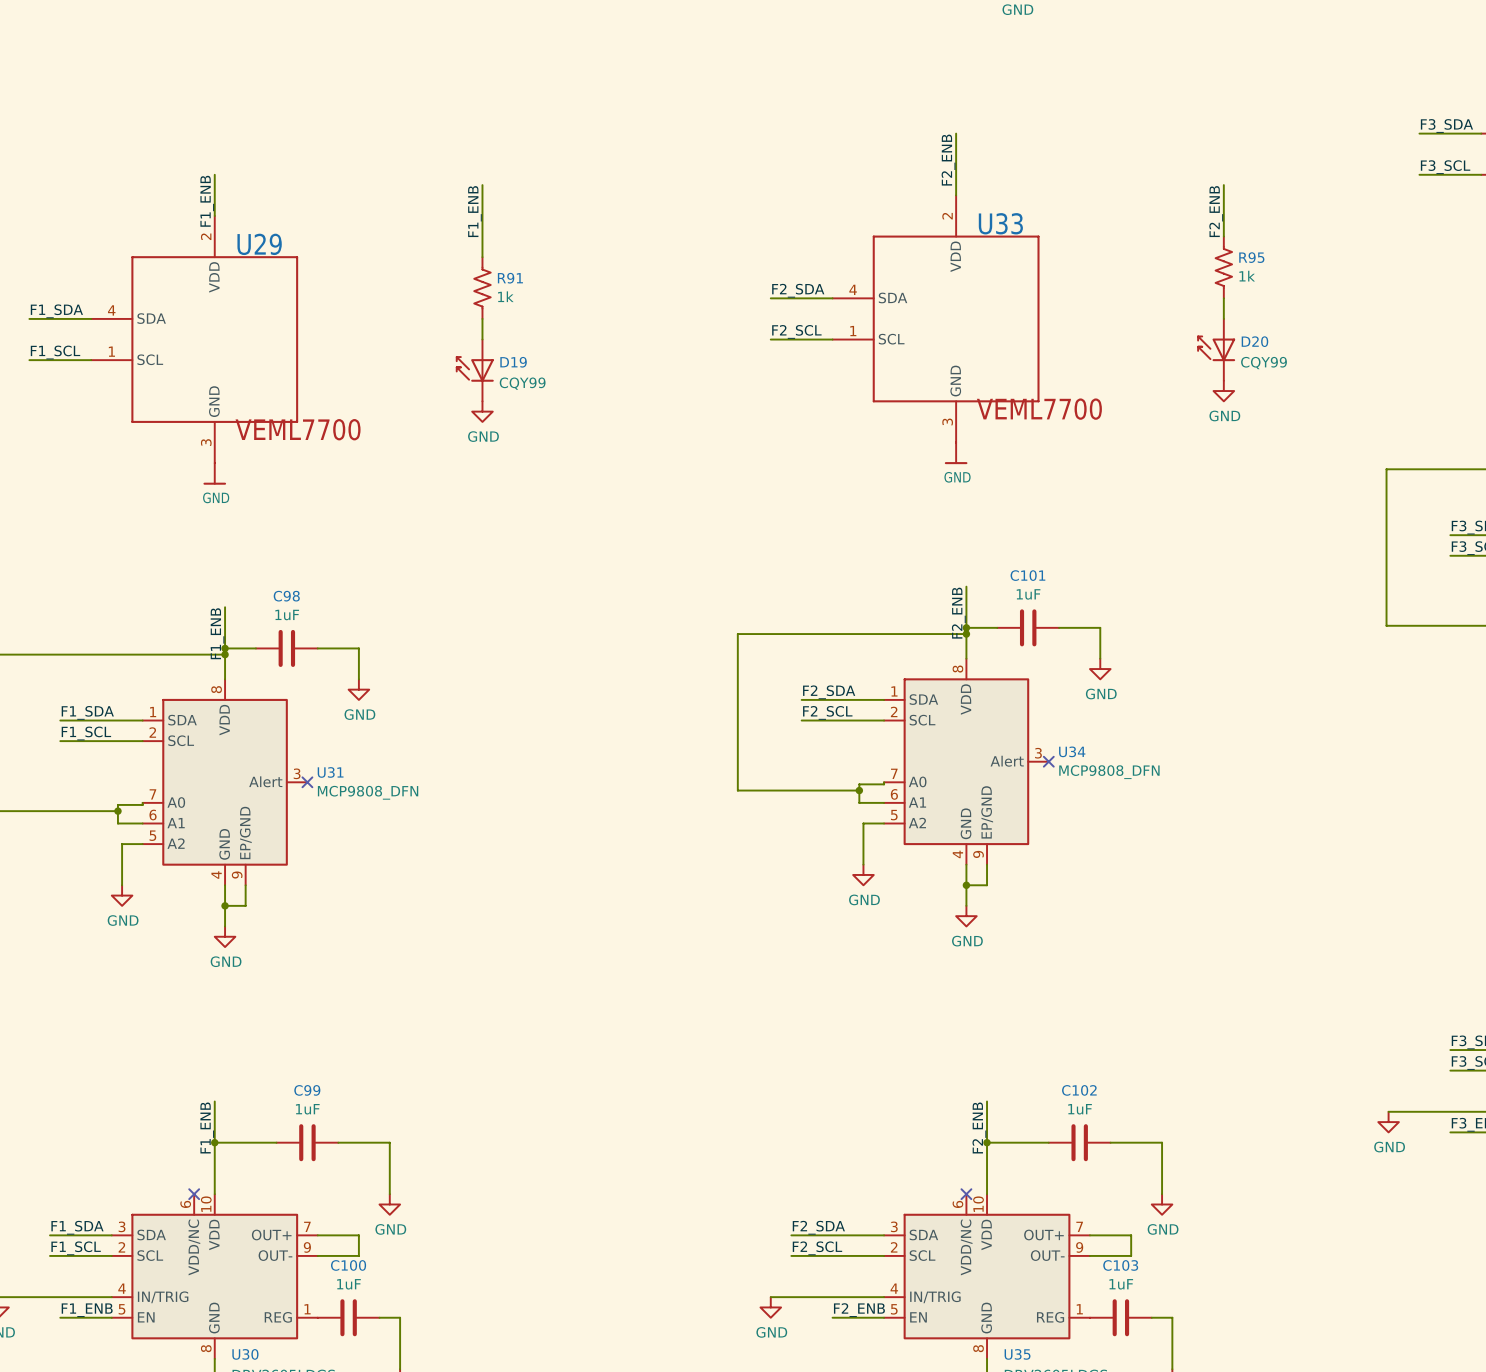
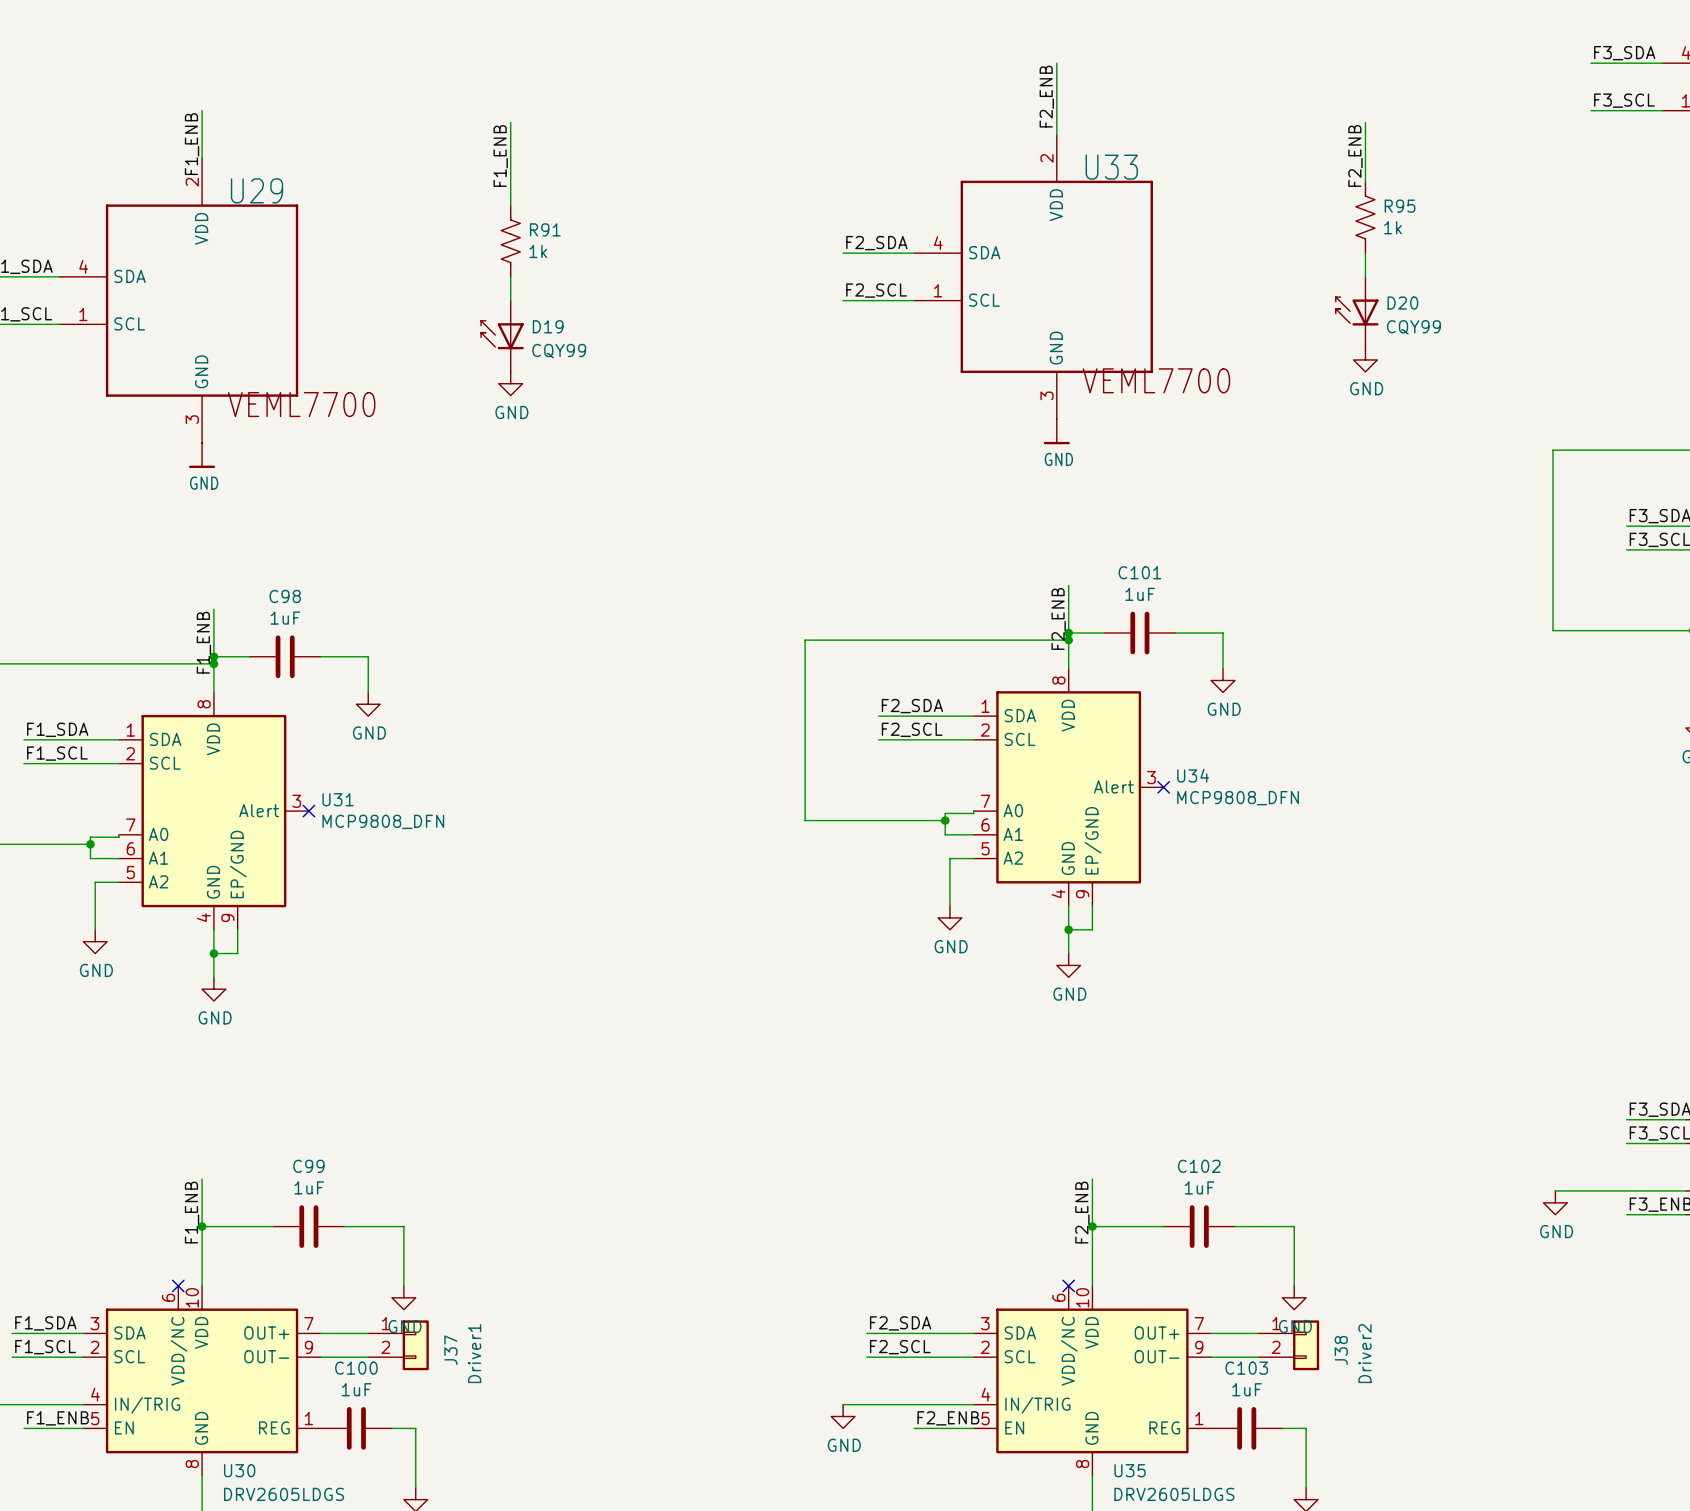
wire: (358, 1235) (358, 1255) -> none
wire: (1131, 1235) (1131, 1255) -> none
J37: none -> Driver1 (398, 1345)
J38: none -> Driver2 (1288, 1345)

